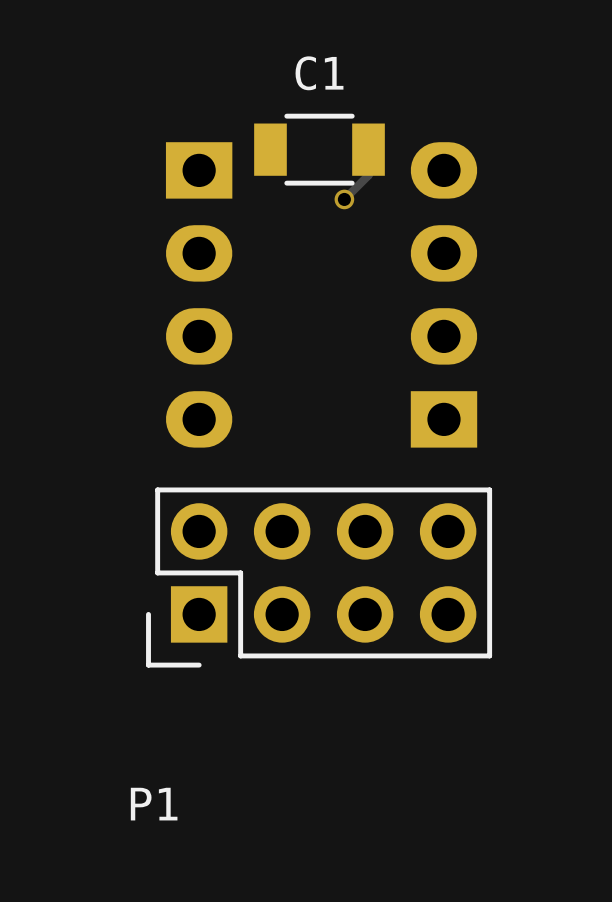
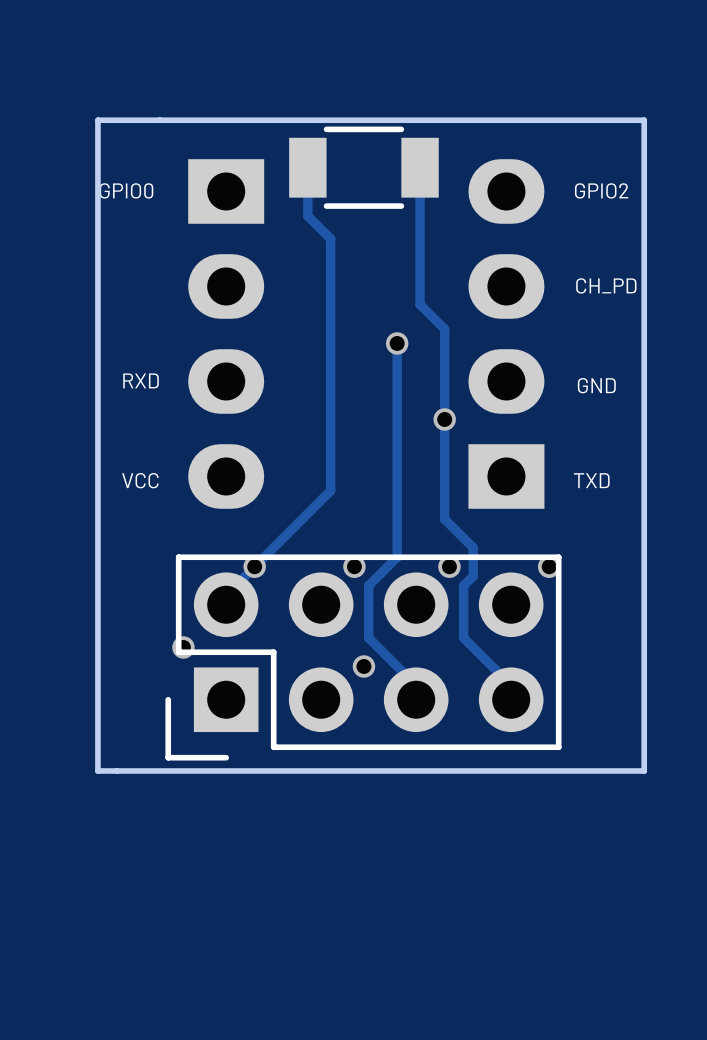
C1 name: C1 (319, 73) -> none
board edge: none -> (97, 120) (644, 120) (644, 770) (97, 770) (97, 120)
track: none -> (307, 167) (307, 216) (330, 238) (330, 490) (226, 595) (226, 604)
text: none -> GPIO0 (126, 190)
text: none -> GPIO2 (601, 190)
track: (368, 175) (344, 199) -> (420, 197) (420, 304) (444, 329) (444, 519) (473, 547) (473, 576) (463, 585) (463, 637) (511, 685) (511, 694)
via: (344, 199) -> none
text: none -> CH_PD (606, 285)
track: none -> (397, 343) (397, 557) (368, 585) (368, 637) (416, 685)
via: none -> (397, 343)
text: none -> RXD (141, 380)
text: none -> GND (596, 385)
via: none -> (444, 419)
text: none -> VCC (140, 480)
text: none -> TXD (591, 480)
via: none -> (254, 566)
via: none -> (354, 566)
via: none -> (449, 566)
via: none -> (549, 566)
via: none -> (183, 647)
via: none -> (363, 666)
P1 name: P1 (154, 804) -> none

